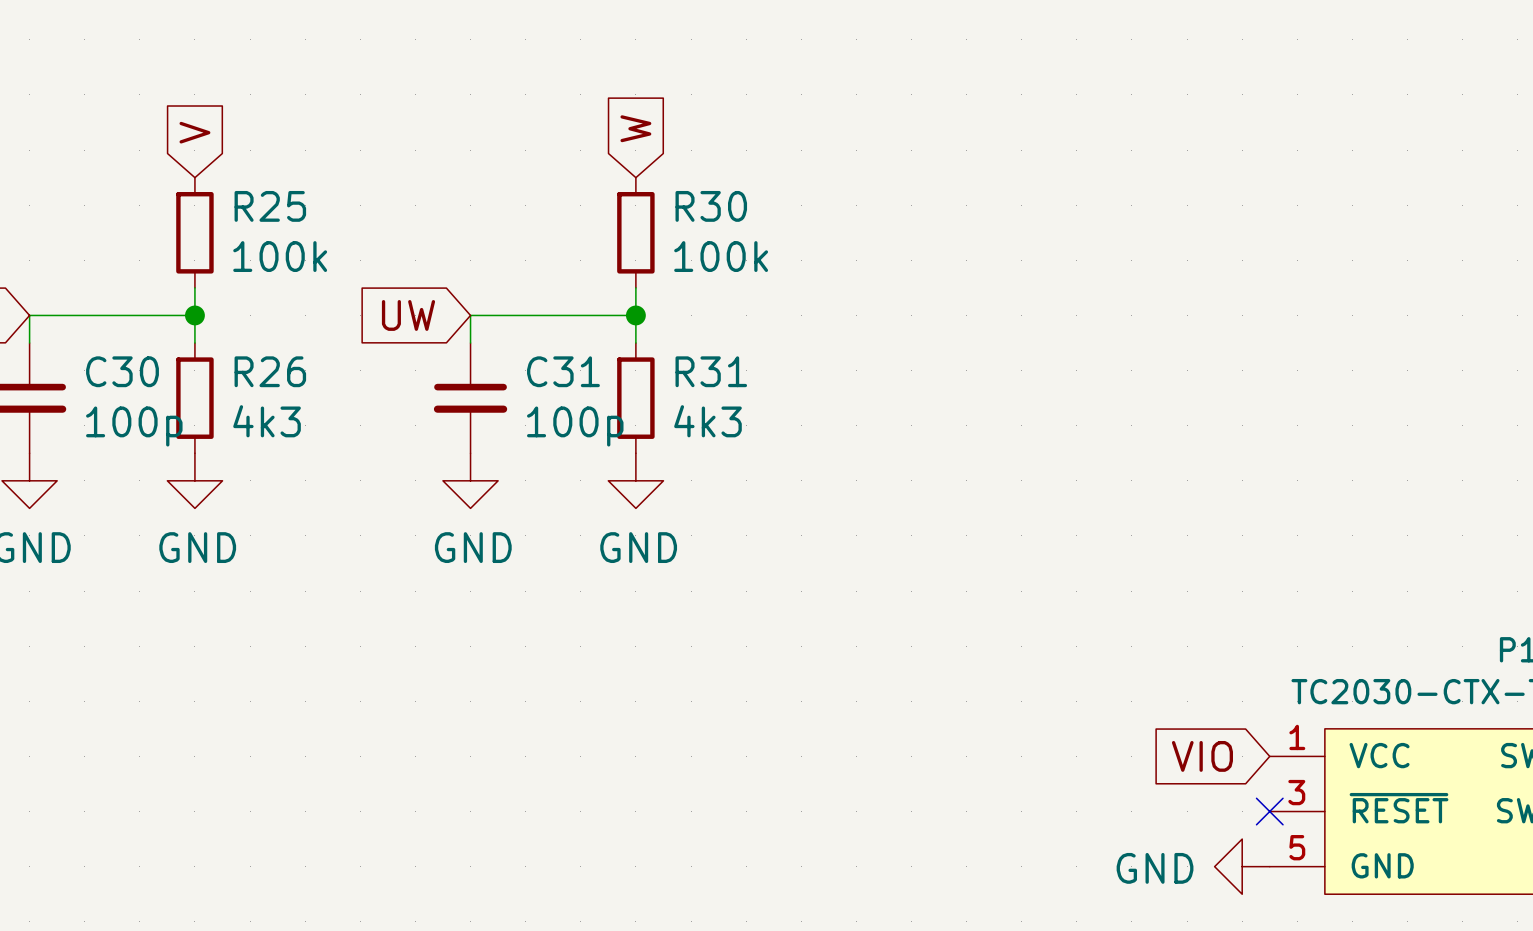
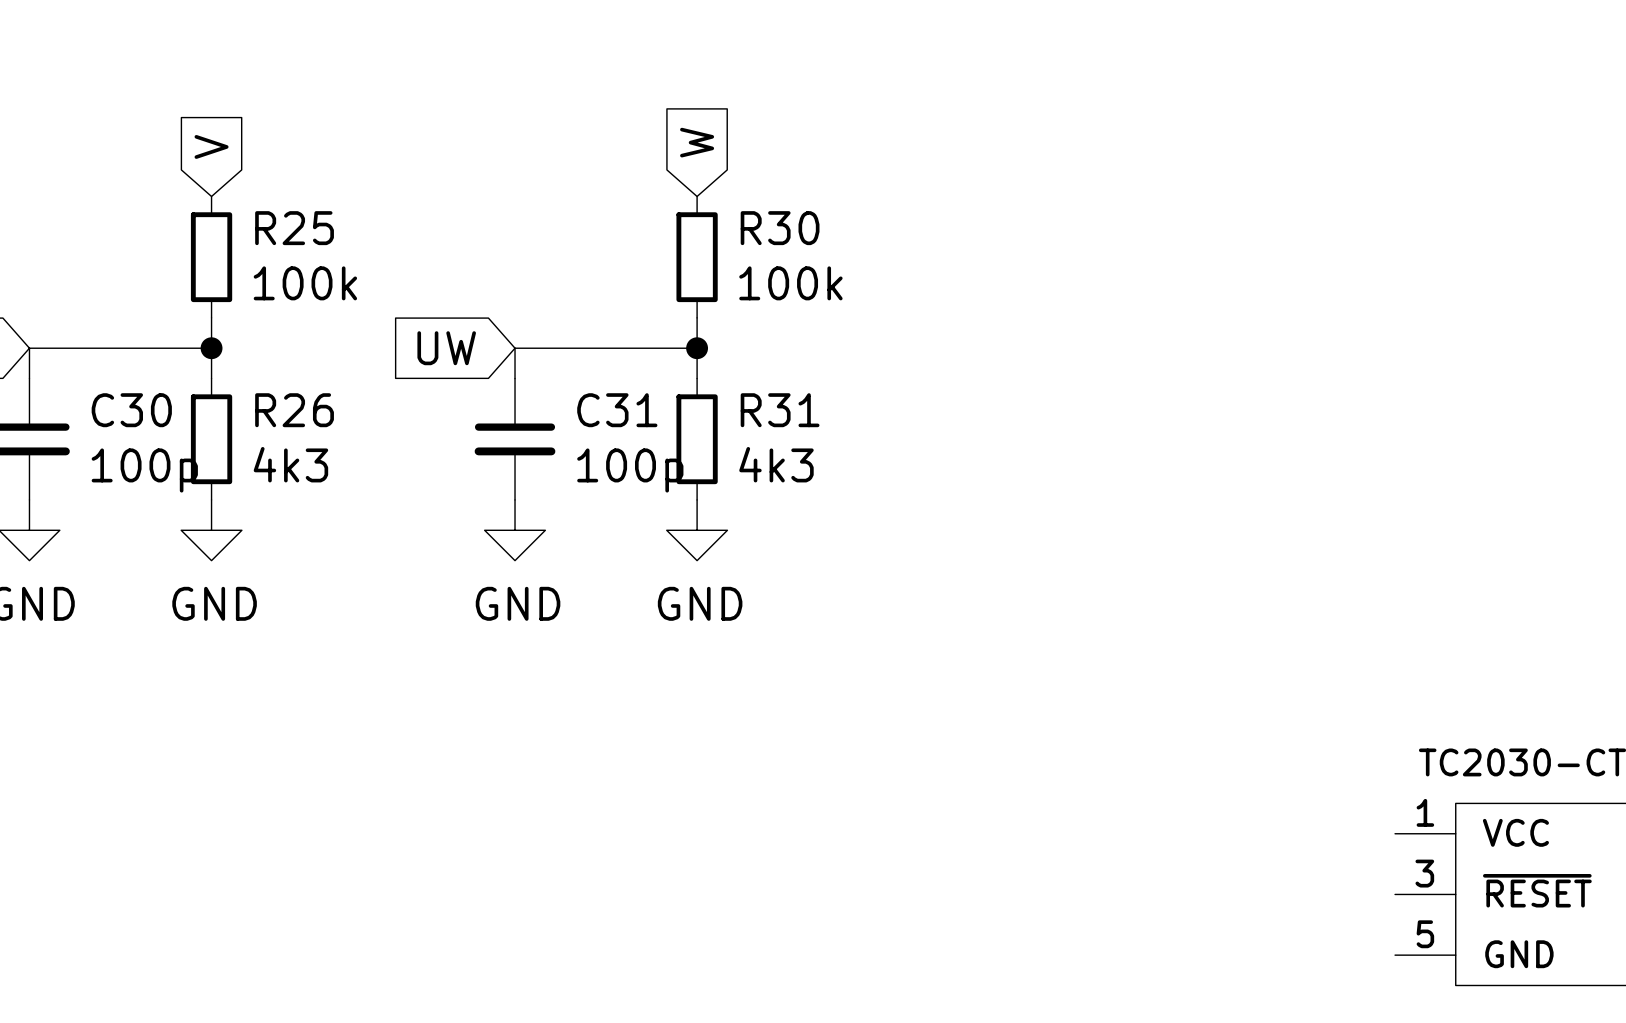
global label: VIO (1202, 756) -> none
no-connect mark: (1269, 811) -> none
power symbol: GND (1242, 866) -> none

